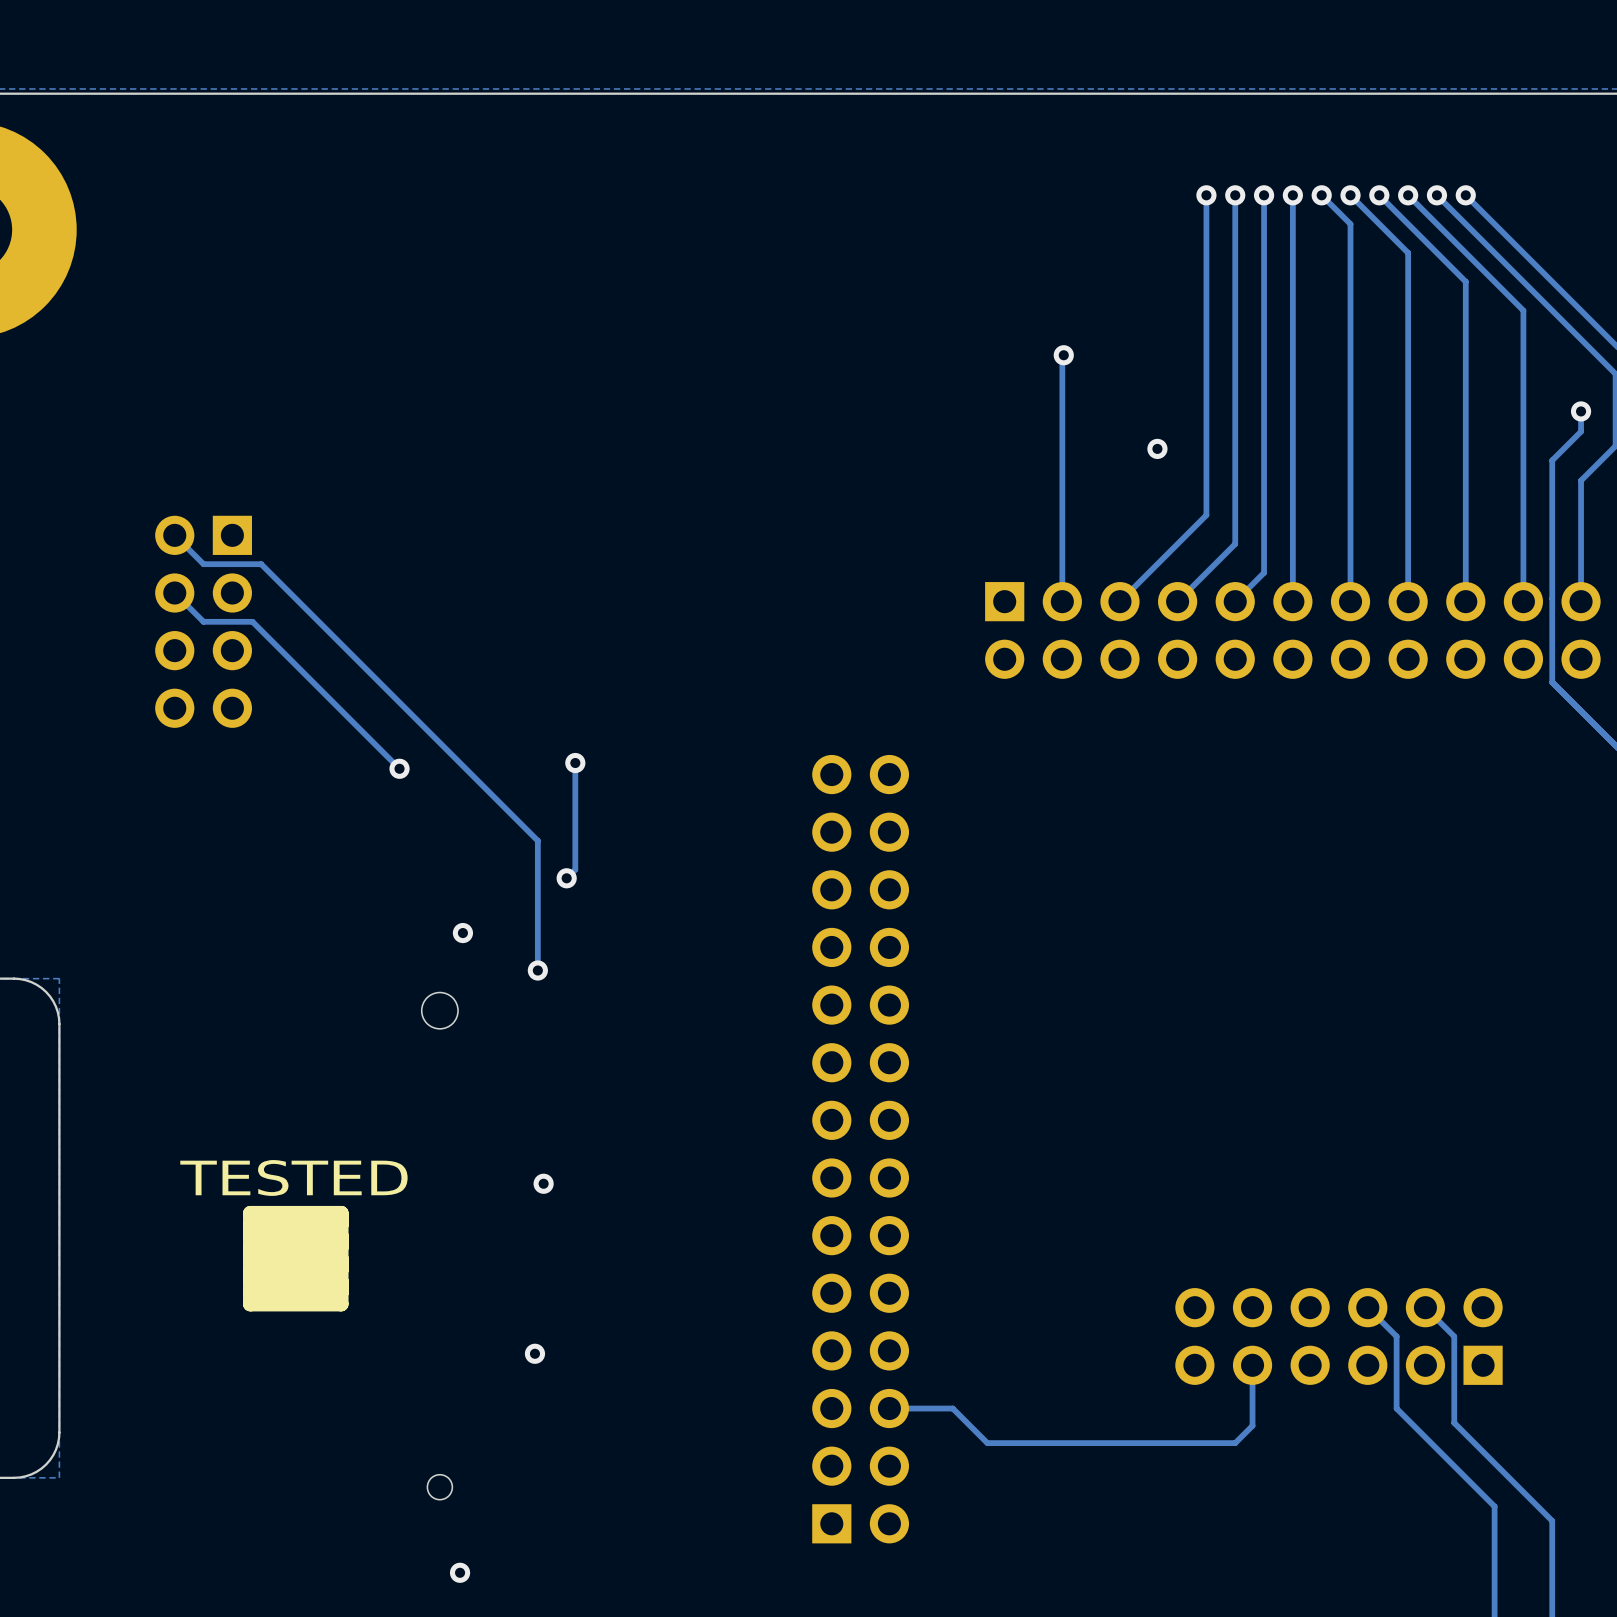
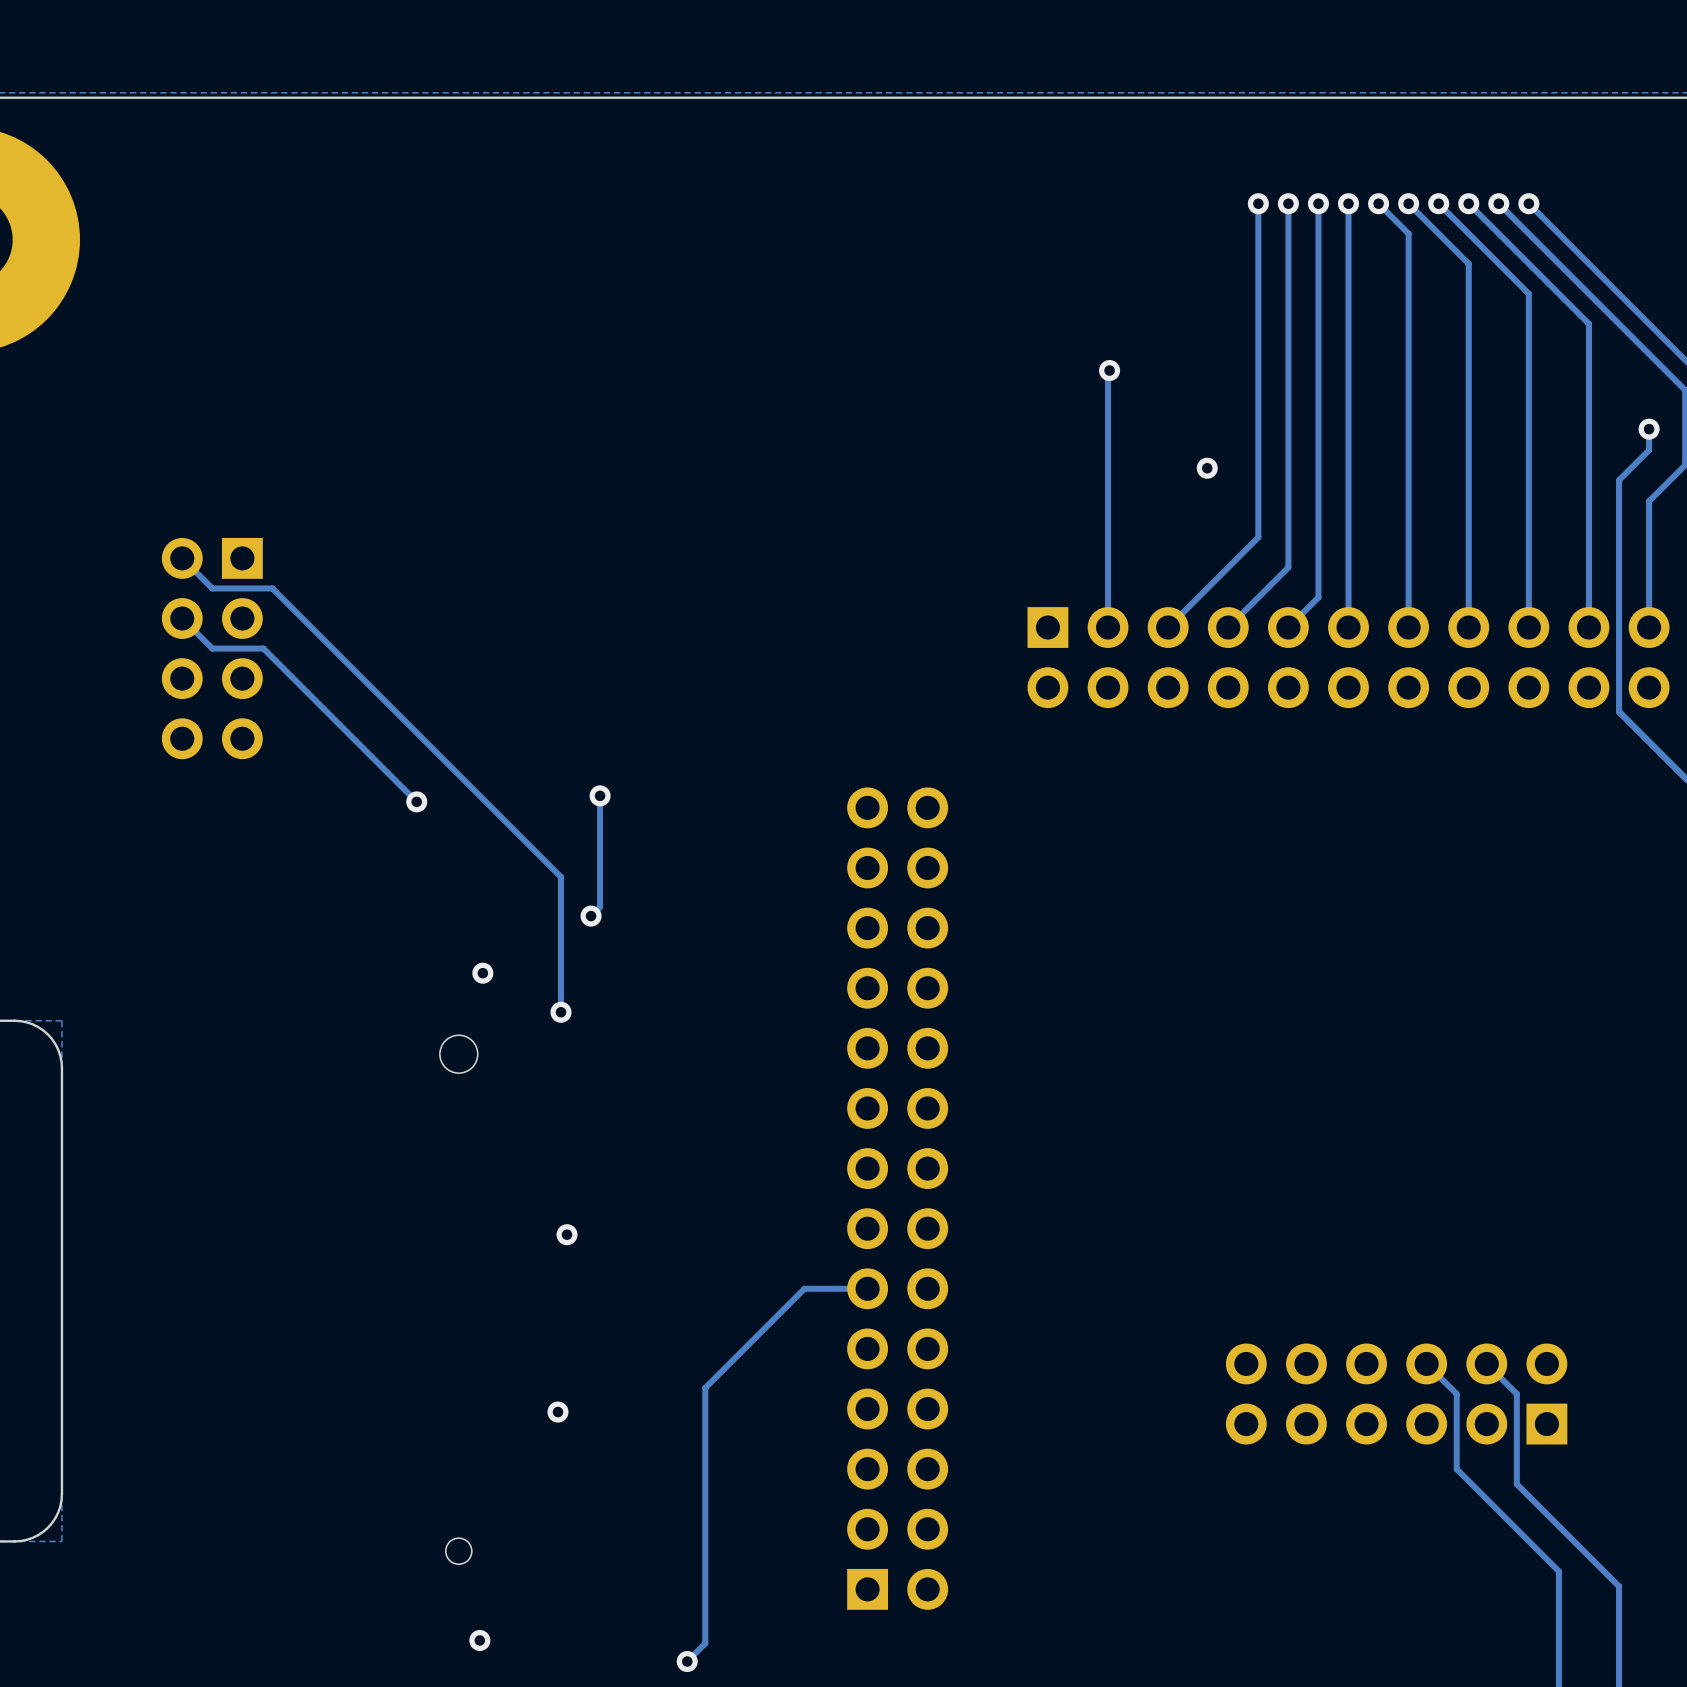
track: none -> (867, 1288) (804, 1288) (705, 1387) (705, 1643) (687, 1661)
TESTED: (295, 1258) -> none
track: (1252, 1365) (1252, 1425) (1235, 1443) (987, 1443) (952, 1408) (889, 1408) -> none
via: none -> (687, 1661)

